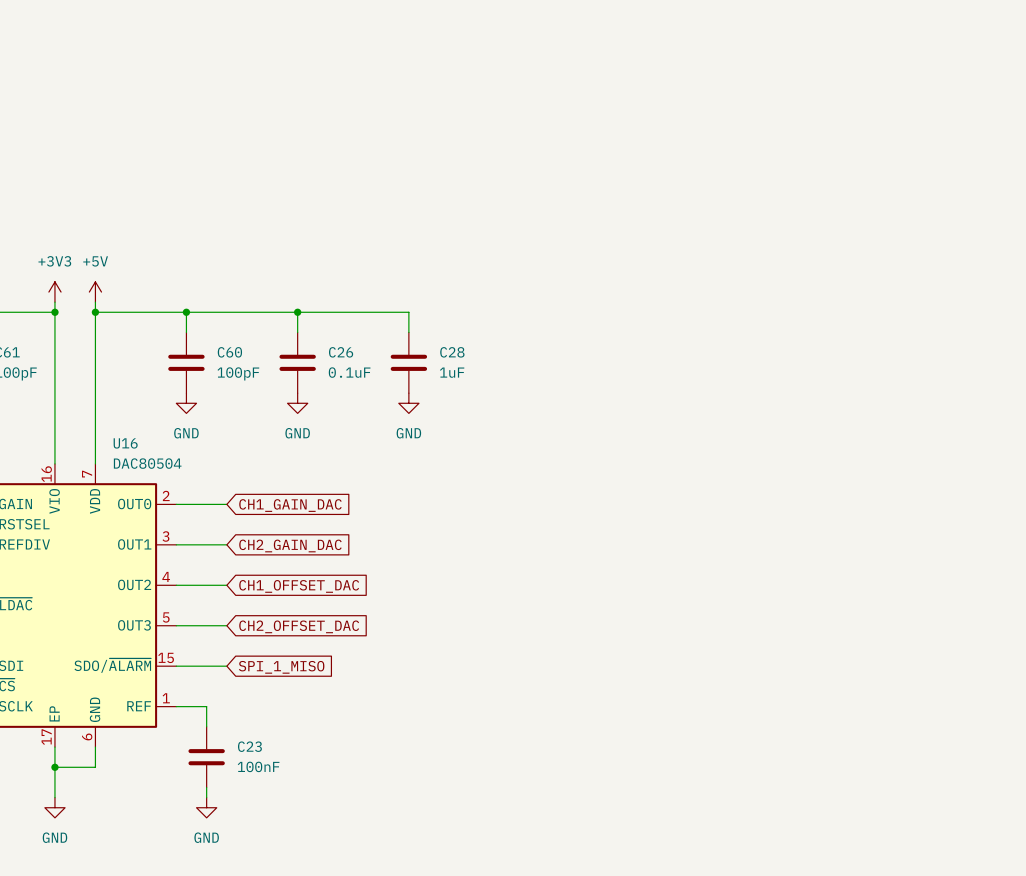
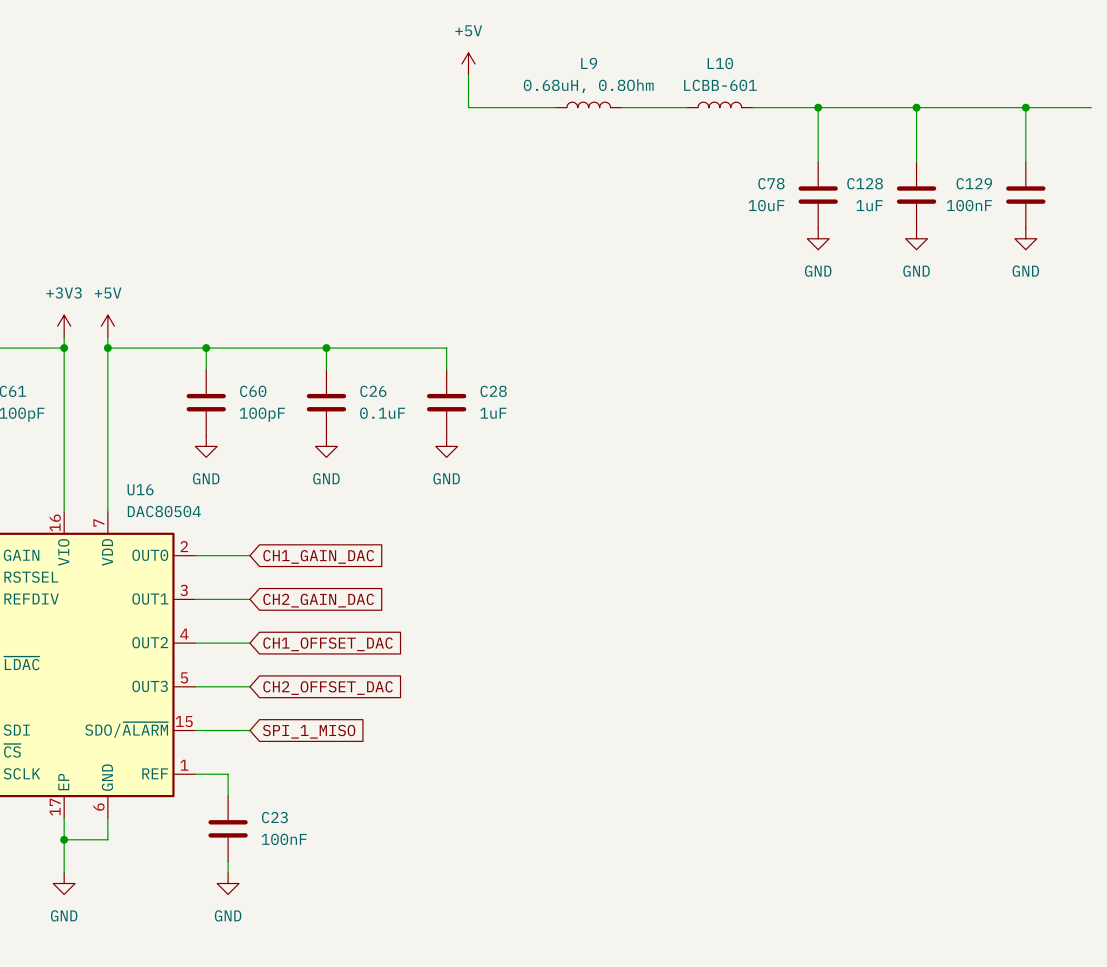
power symbol: none -> +5V (468, 63)
wire: none -> (468, 74) (468, 107) (555, 107)
L9: none -> 0.68uH, 0.8Ohm (588, 104)
L10: none -> LCBB-601 (719, 104)
wire: none -> (621, 107) (687, 107)
wire: none -> (752, 107) (1091, 107)
wire: none -> (818, 107) (818, 162)
junction: none -> (818, 107)
wire: none -> (916, 107) (916, 162)
junction: none -> (916, 107)
wire: none -> (1025, 107) (1025, 162)
junction: none -> (1025, 107)
C78: none -> 10uF (818, 195)
C128: none -> 1uF (916, 195)
C129: none -> 100nF (1025, 195)
power symbol: none -> GND (818, 238)
power symbol: none -> GND (916, 238)
power symbol: none -> GND (1025, 238)

